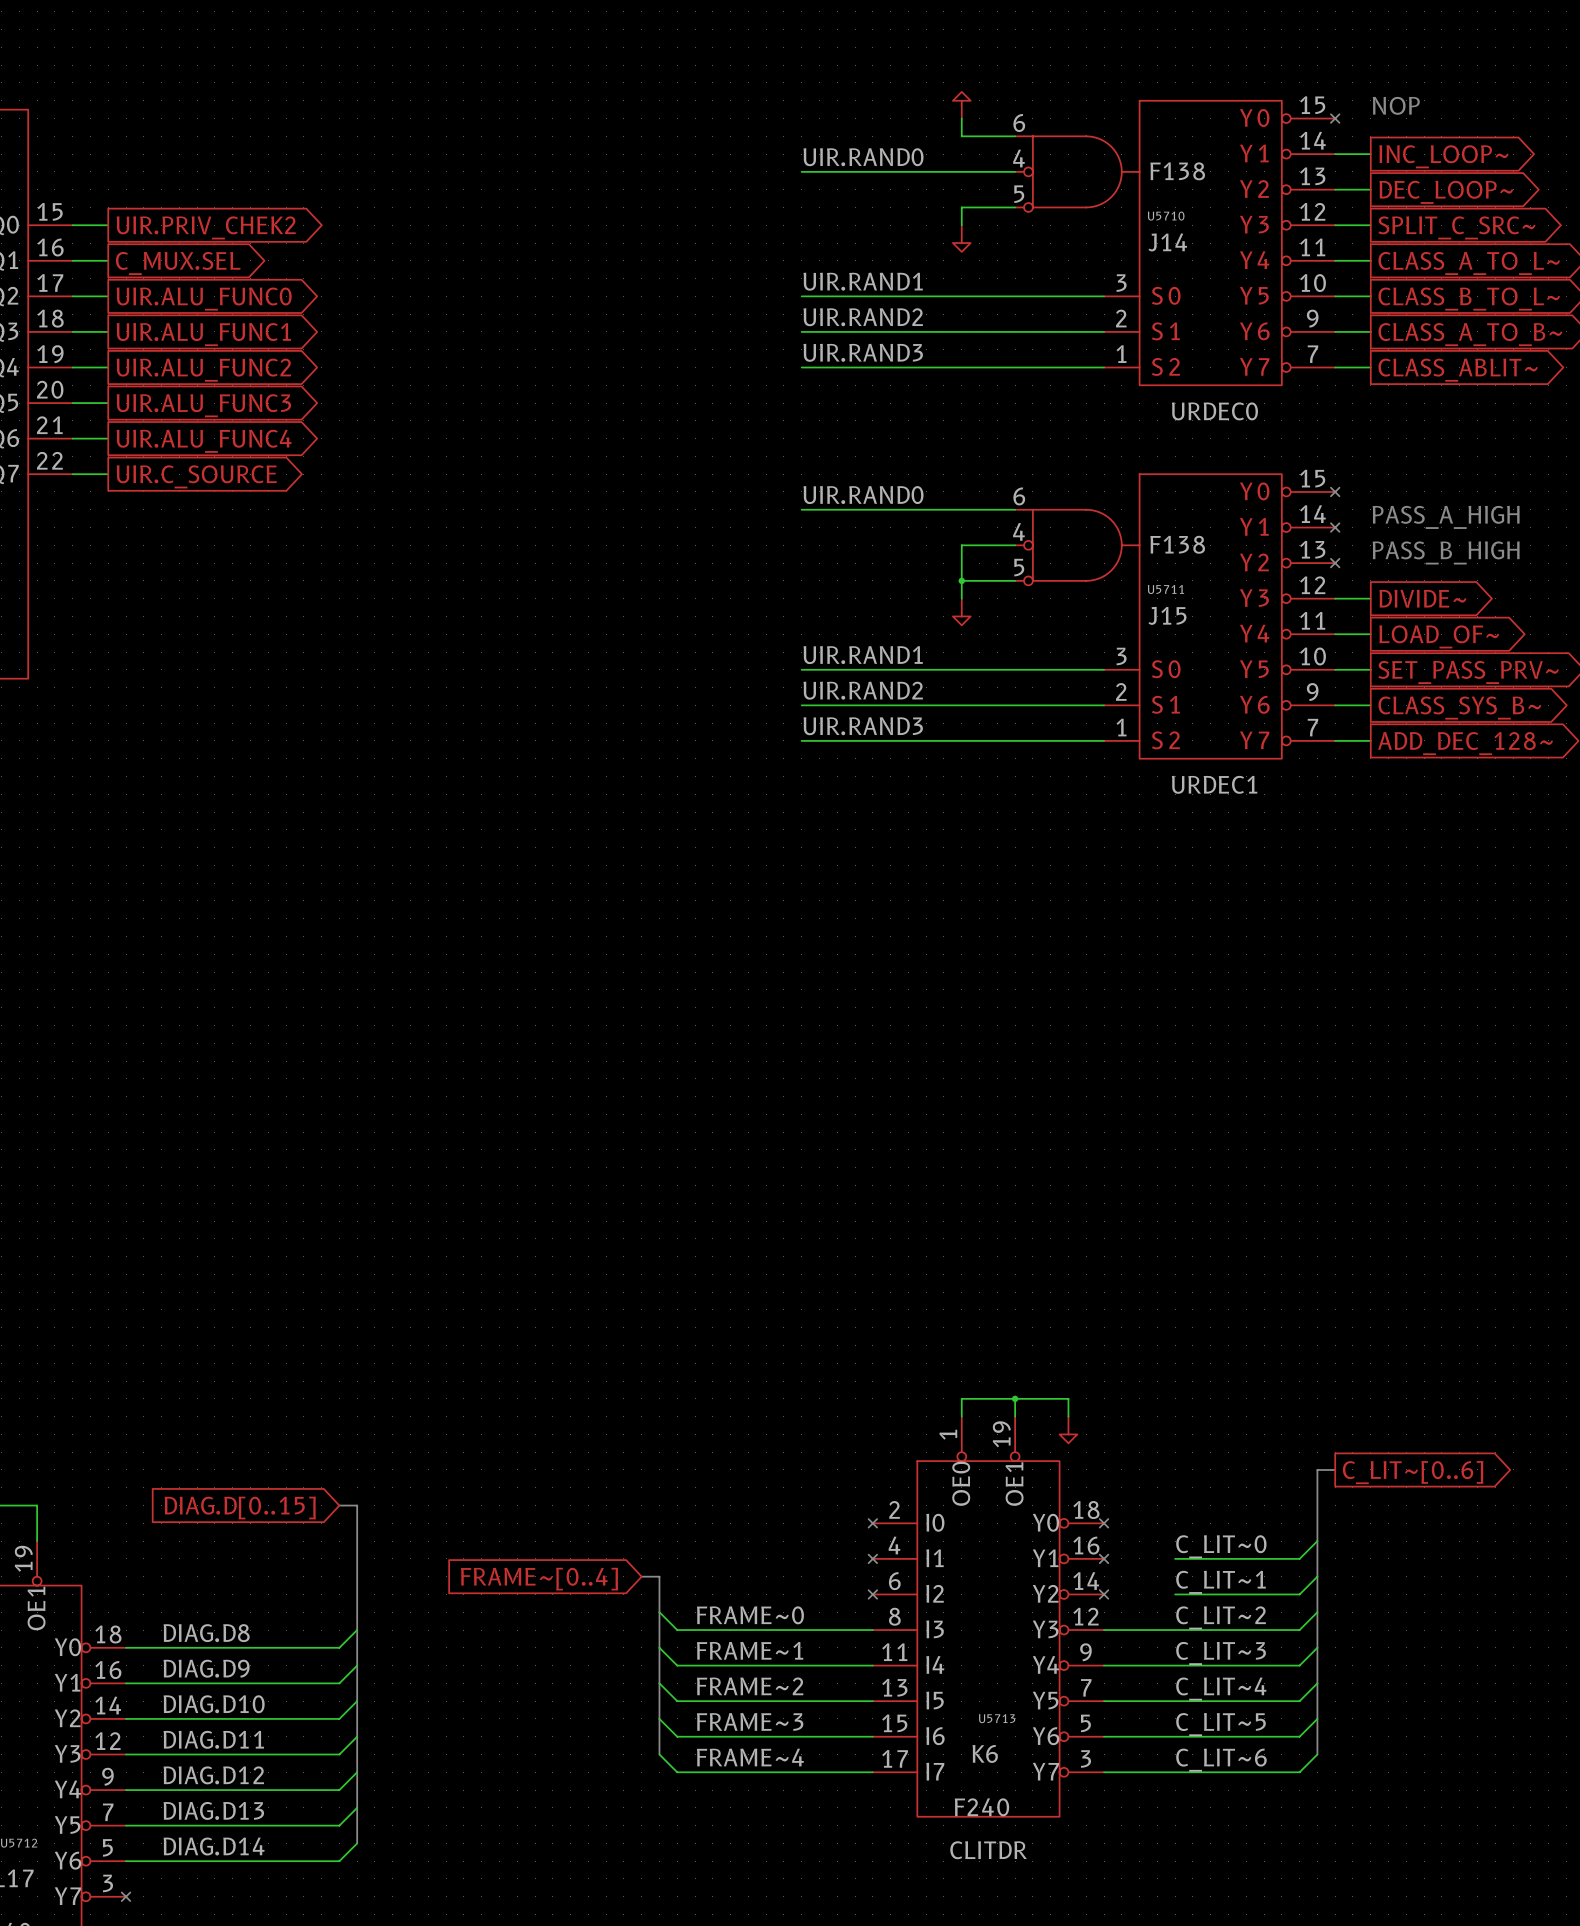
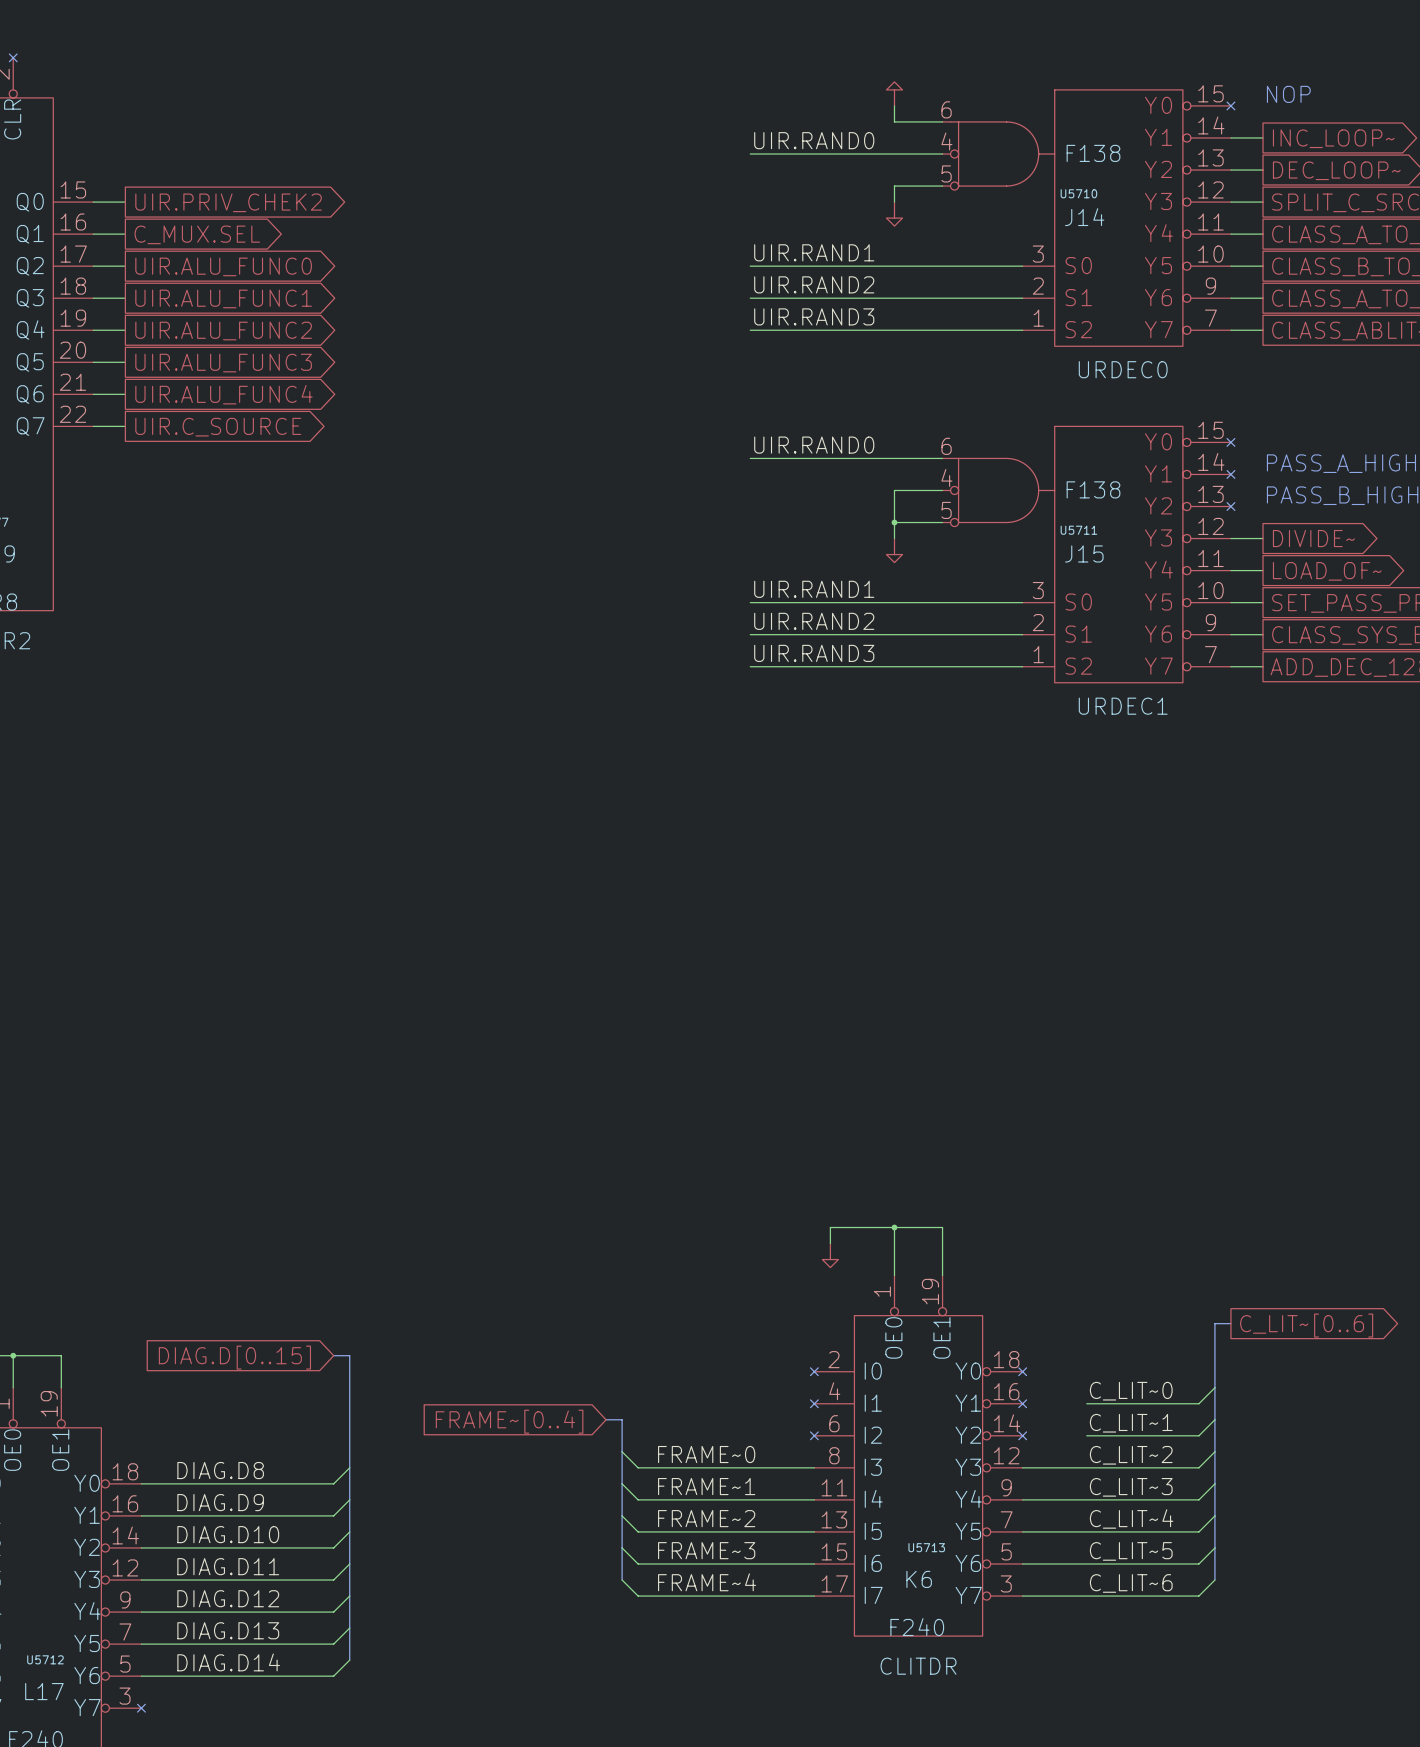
junction: none -> (894, 1227)
wire: none -> (830, 1243) (830, 1227) (942, 1227) (942, 1259)
power symbol: none -> (830, 1255)
wire: (961, 1398) (1068, 1398) (1068, 1416) -> (894, 1259) (894, 1227)
junction: (1015, 1398) -> none
power symbol: (1068, 1430) -> none

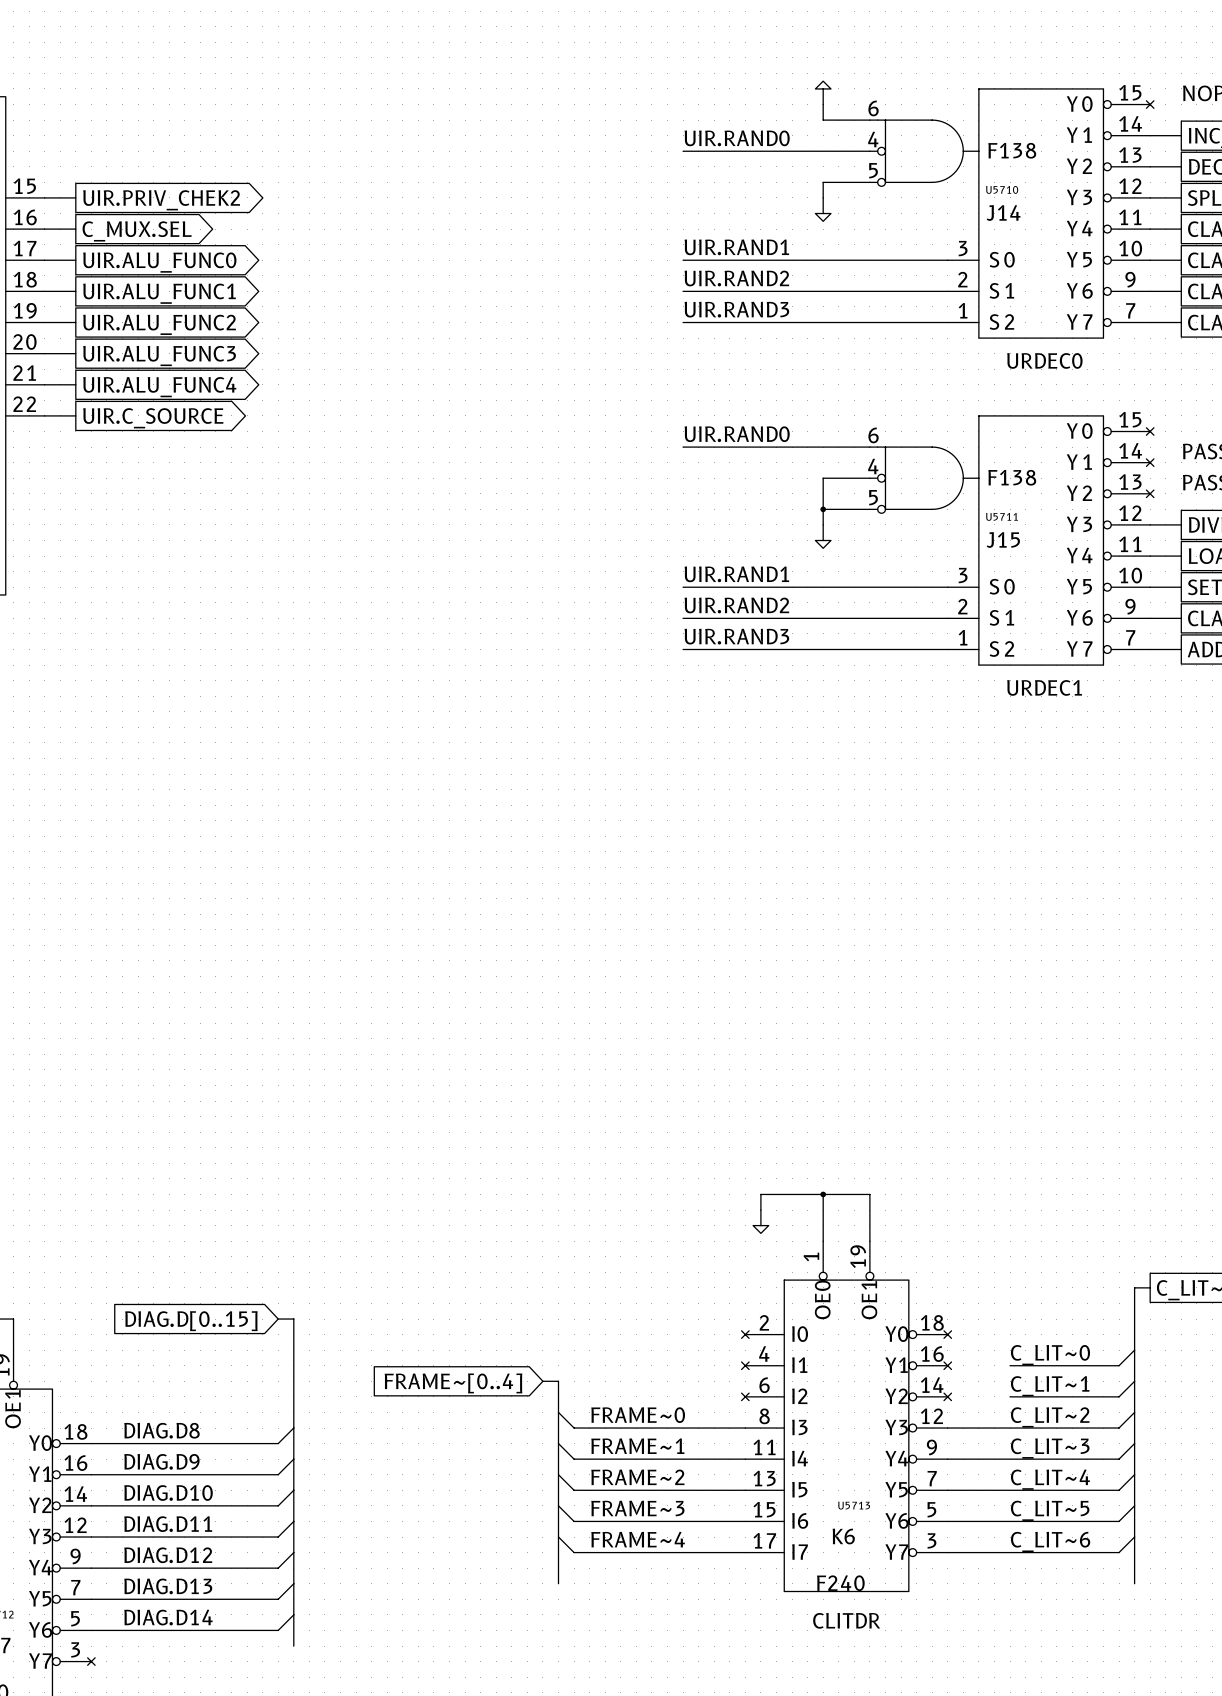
bus: none -> (558, 1537) (558, 1583)
bus: none -> (1134, 1537) (1134, 1583)
bus: none -> (293, 1614) (293, 1646)

